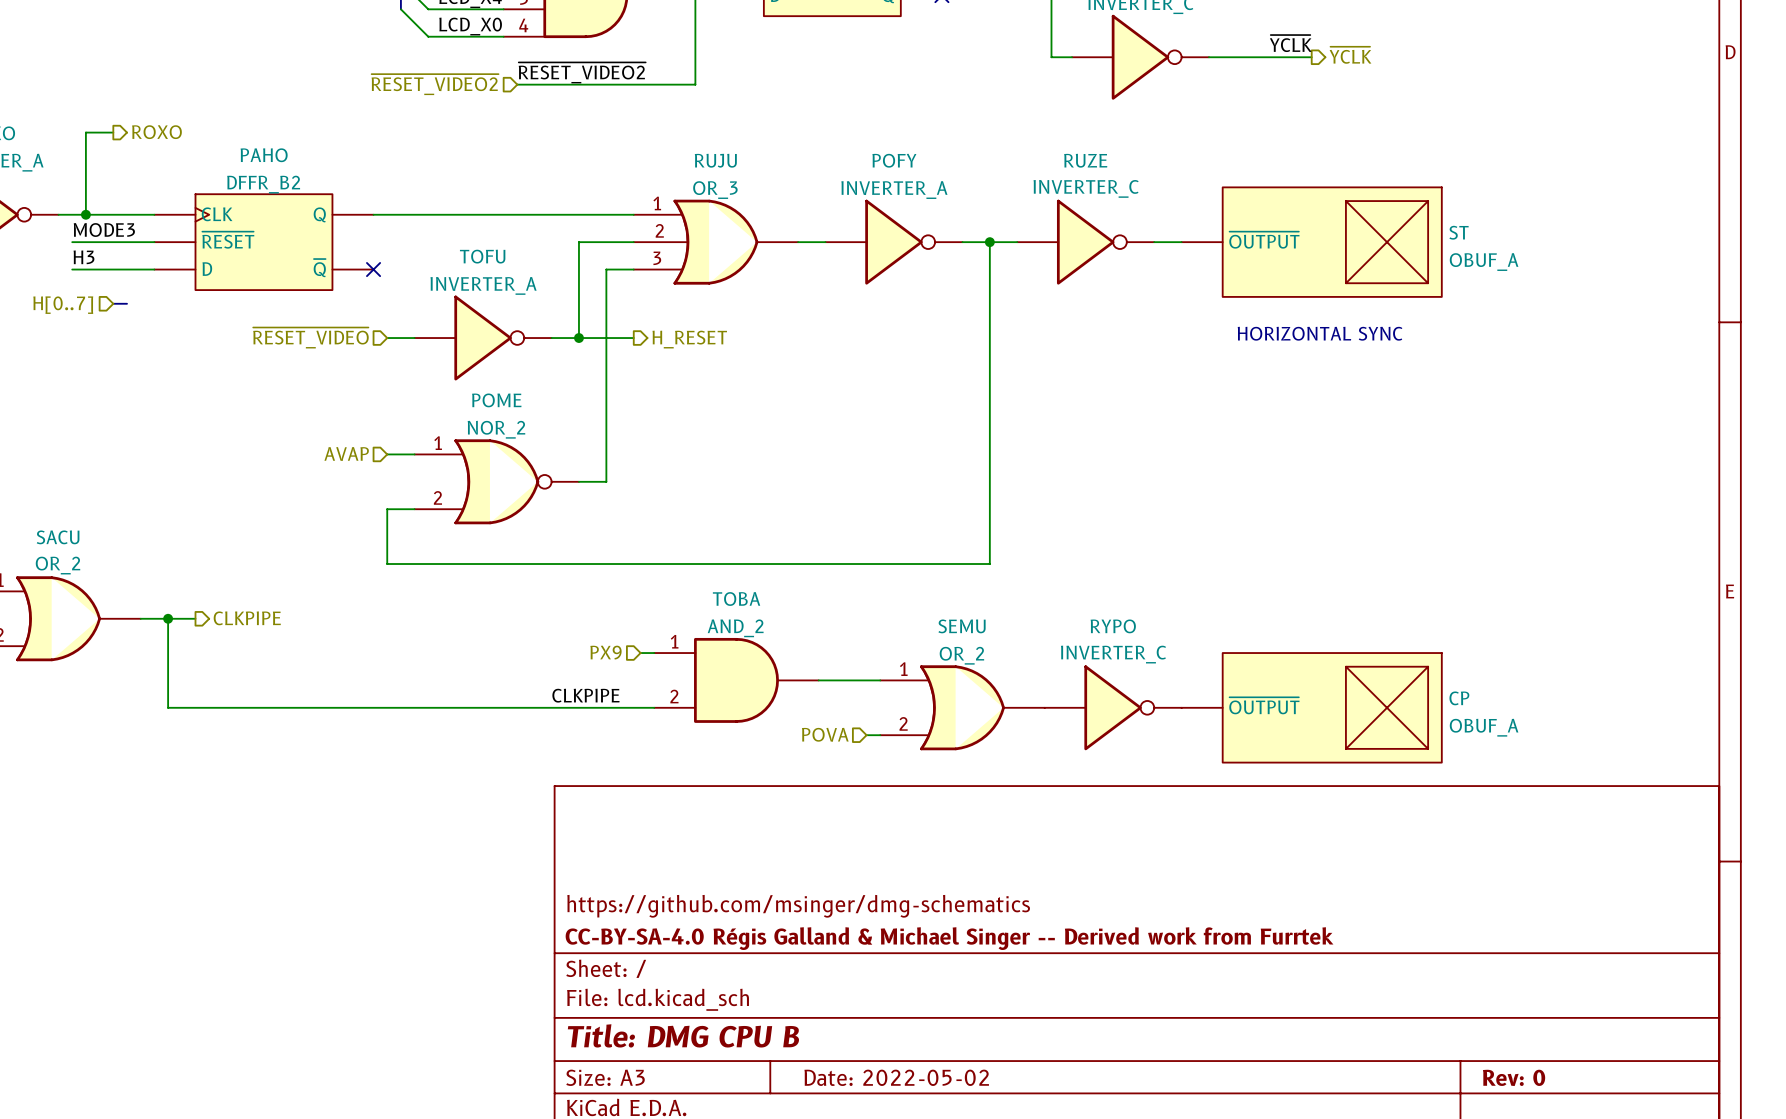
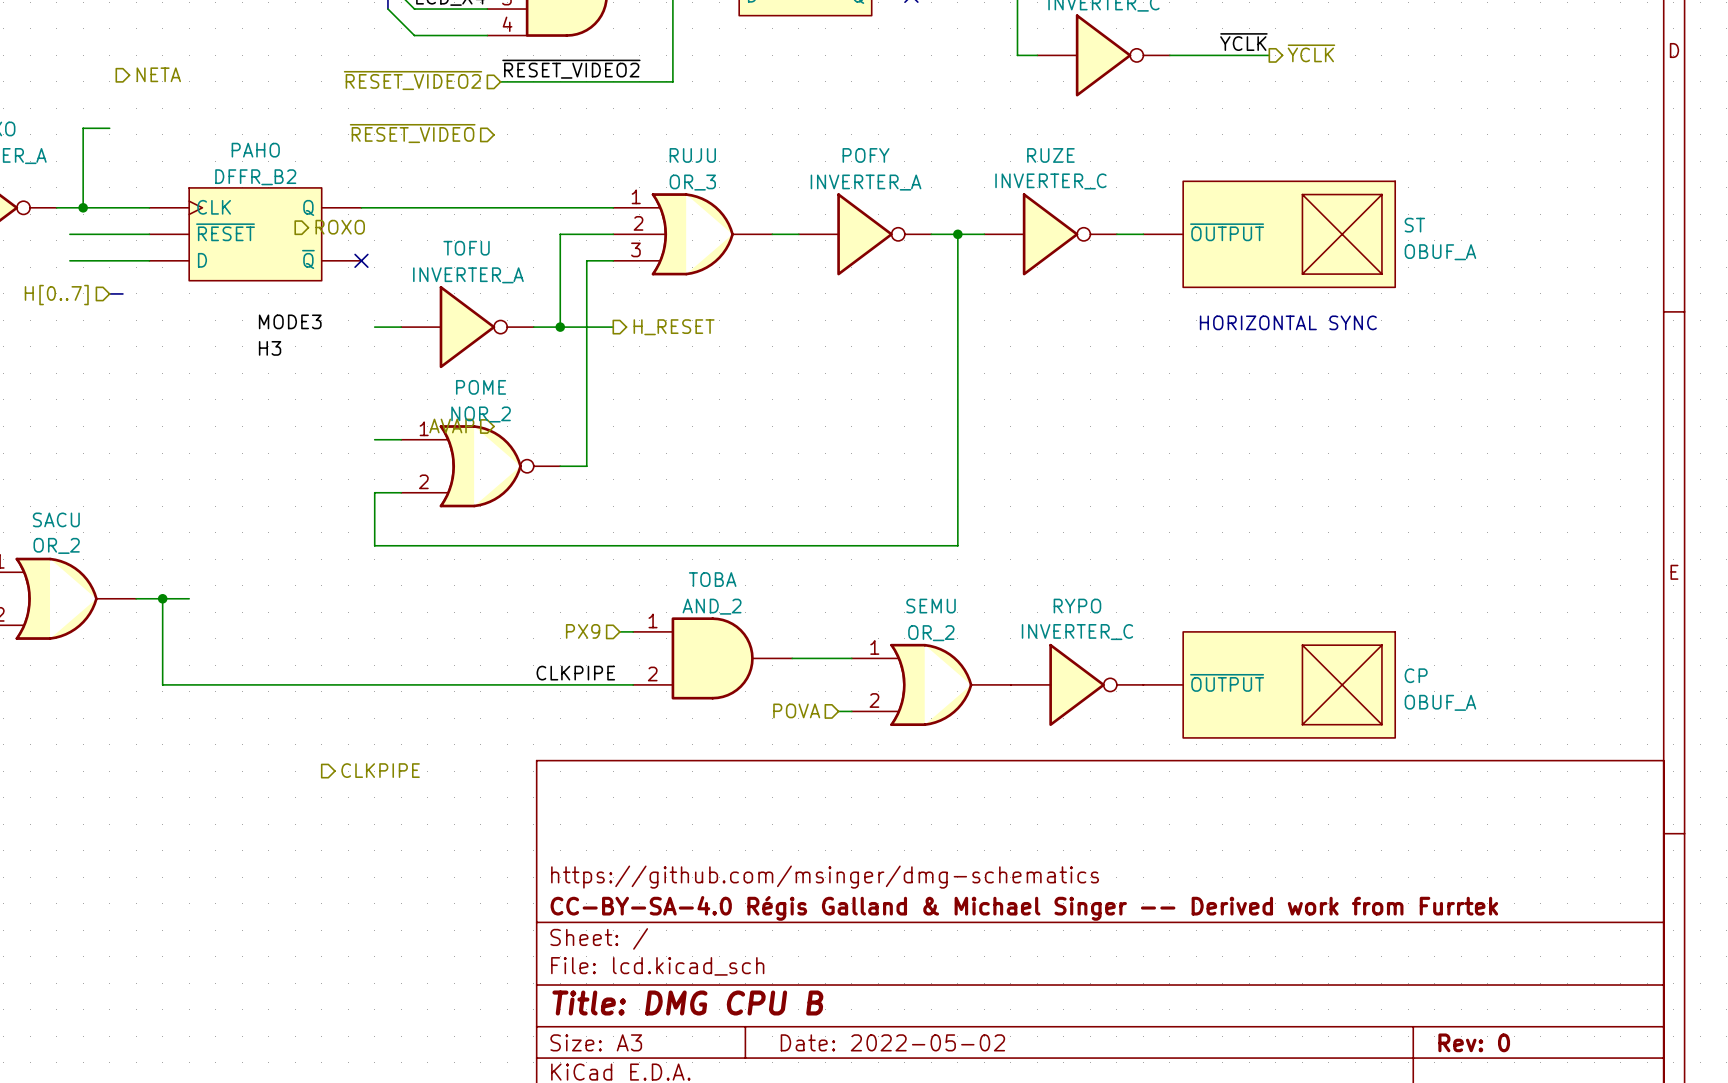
label: LCD_X0 (470, 26) -> none
hierarchical label: none -> NETA (158, 74)
hierarchical label position: ROXO (156, 132) -> ROXO (340, 227)
label position: MODE3 (104, 230) -> MODE3 (290, 321)
label position: H3 (83, 257) -> H3 (270, 348)
hierarchical label position: ~{RESET_VIDEO} (310, 337) -> ~{RESET_VIDEO} (412, 133)
hierarchical label position: AVAP (346, 454) -> AVAP (451, 425)
hierarchical label position: CLKPIPE (247, 618) -> CLKPIPE (380, 770)

